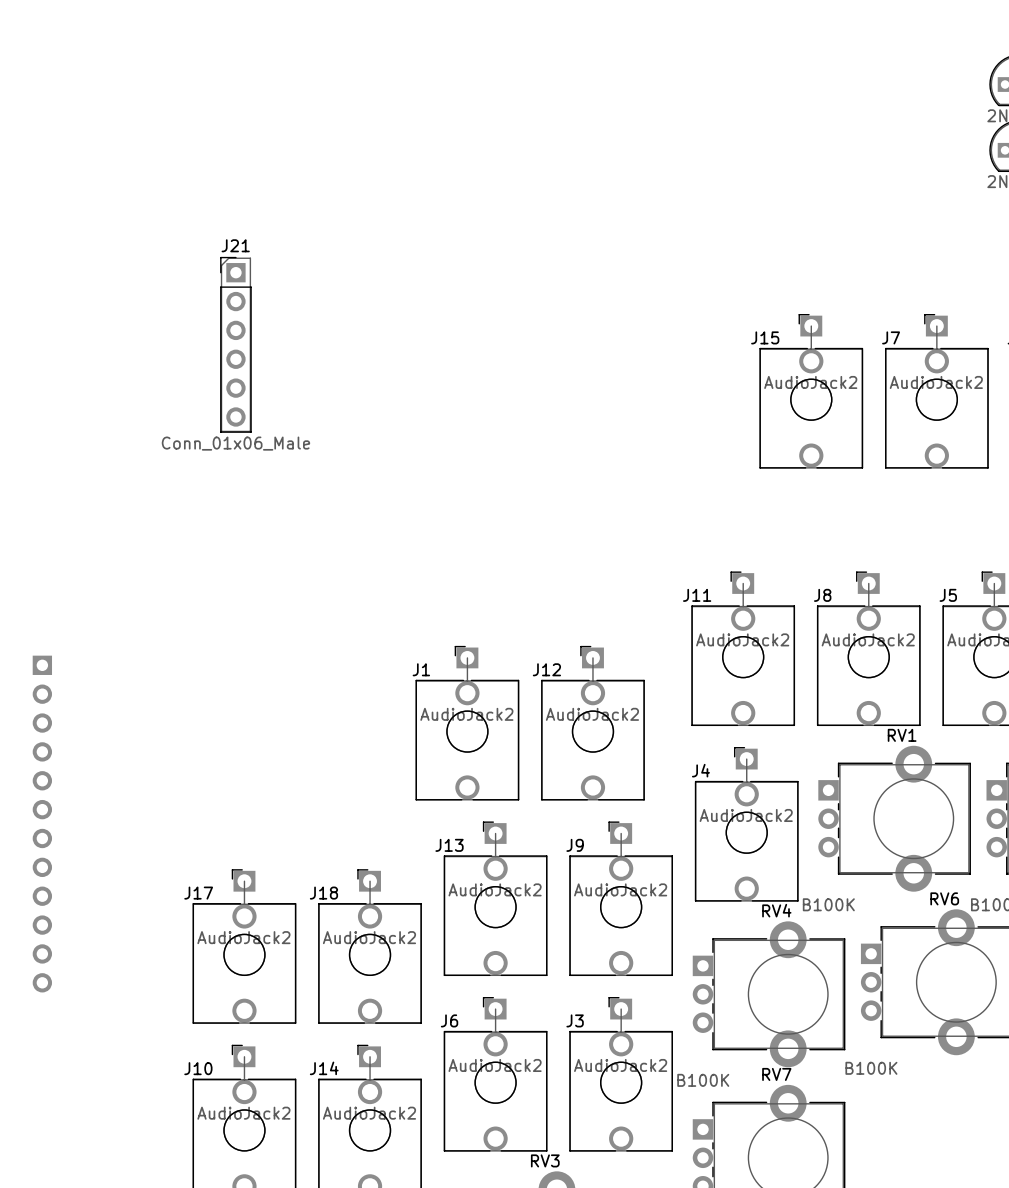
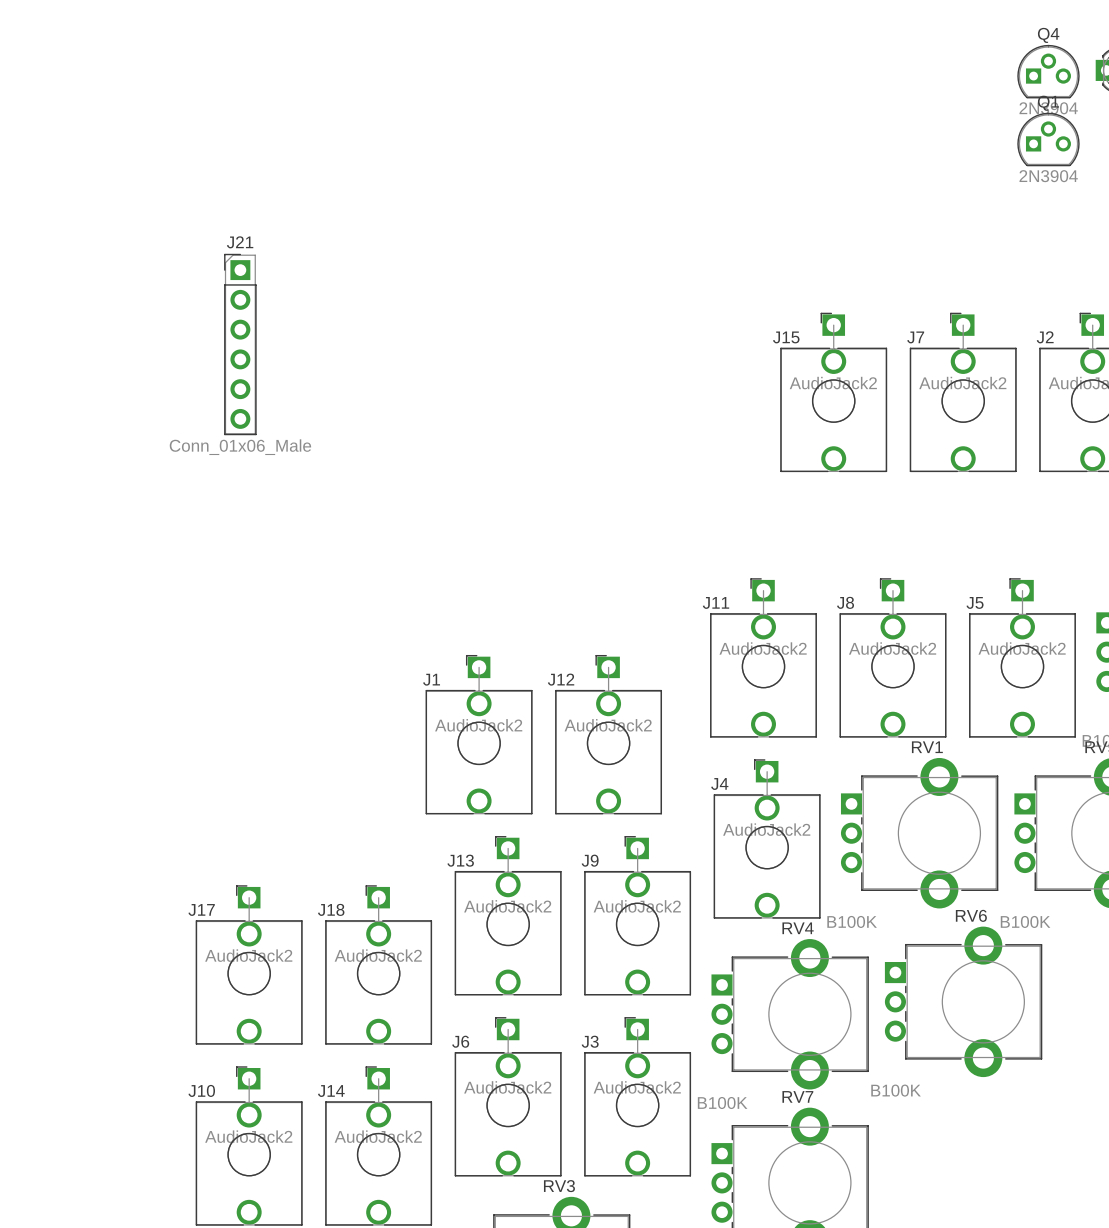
part: (42, 824) -> none

